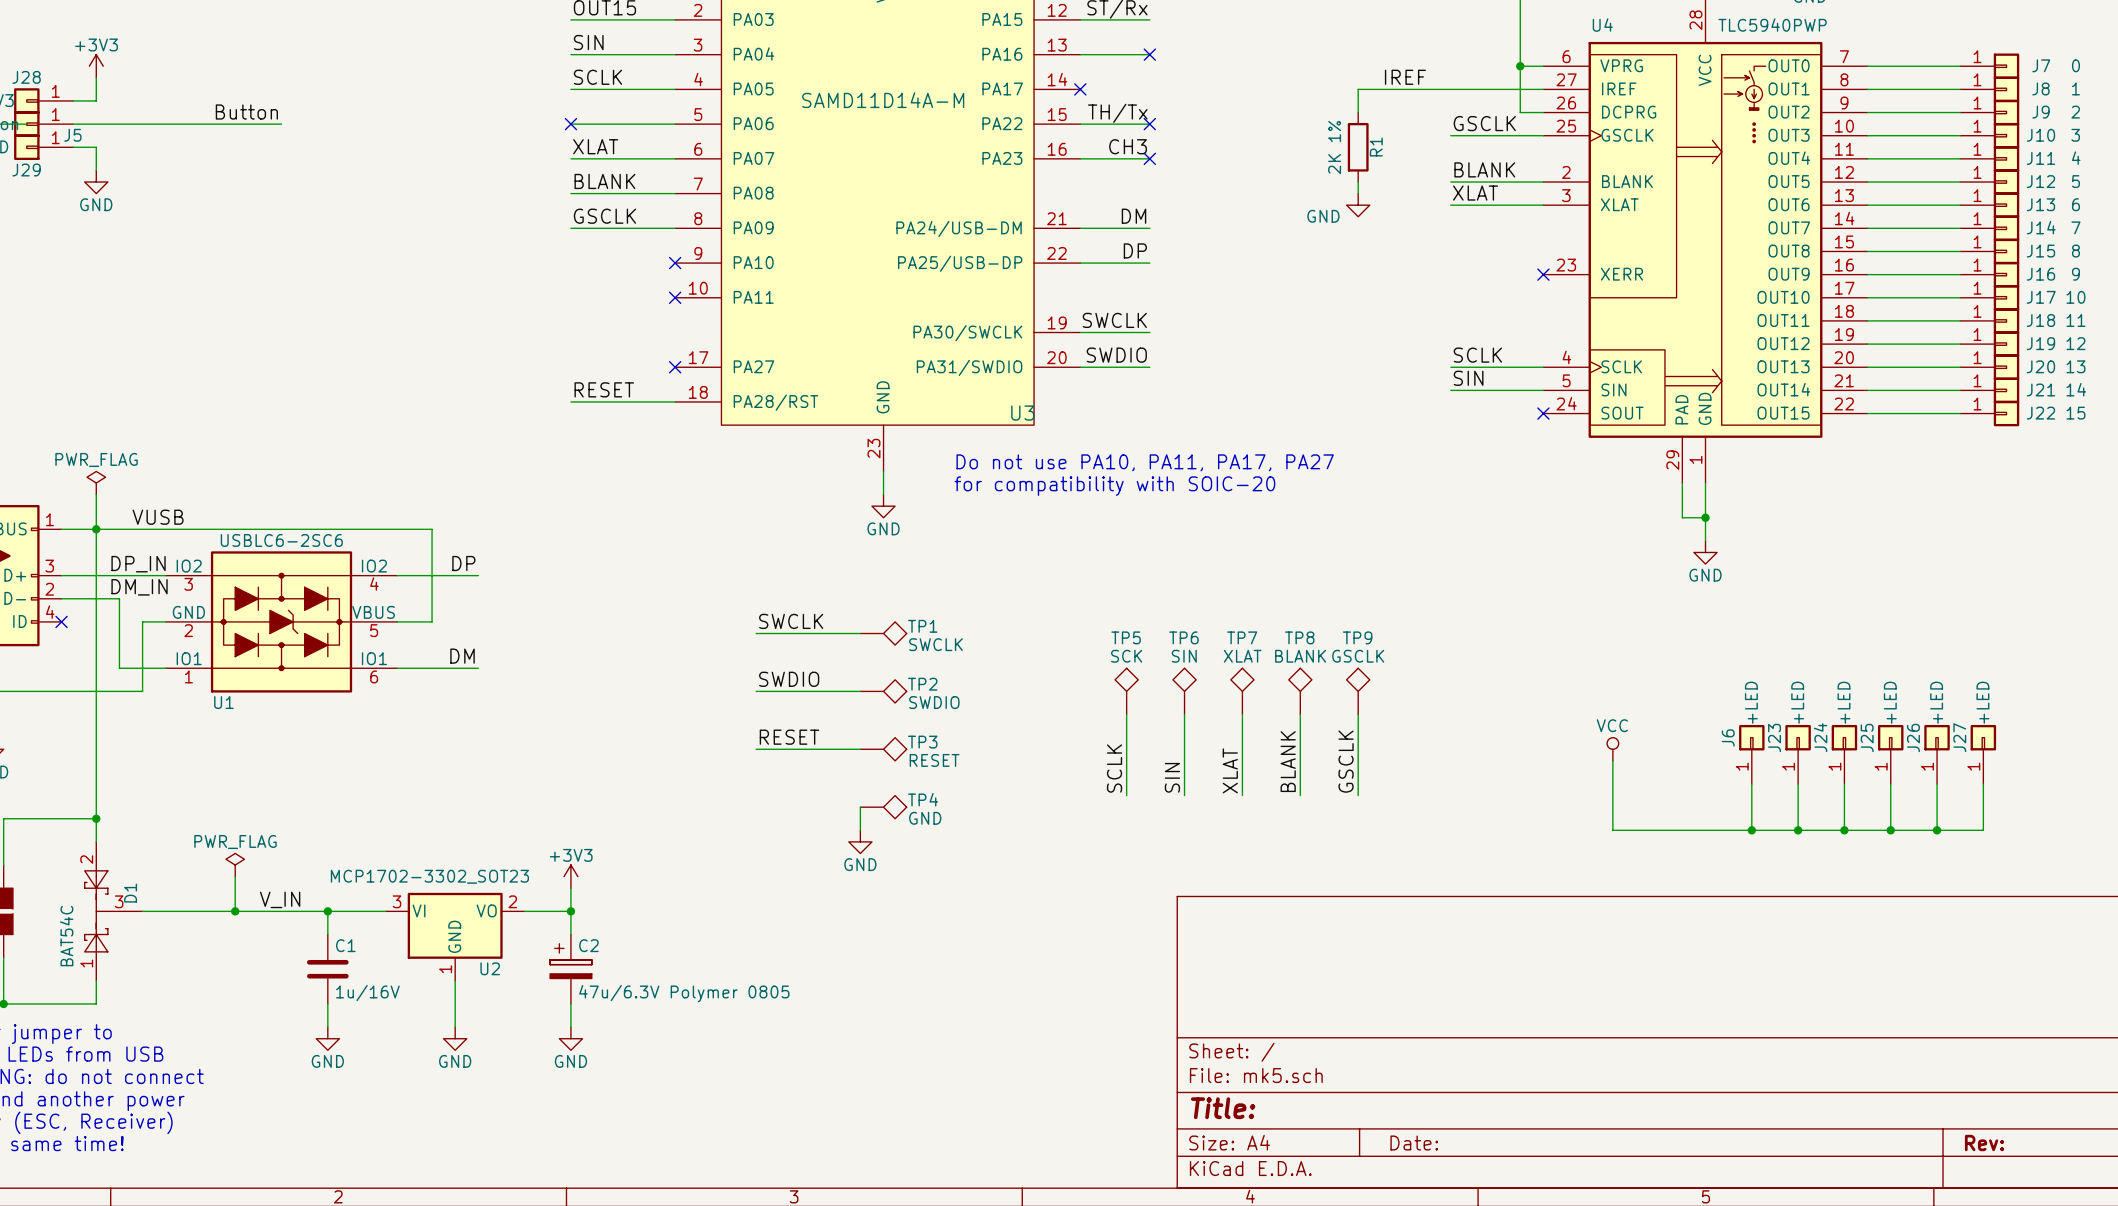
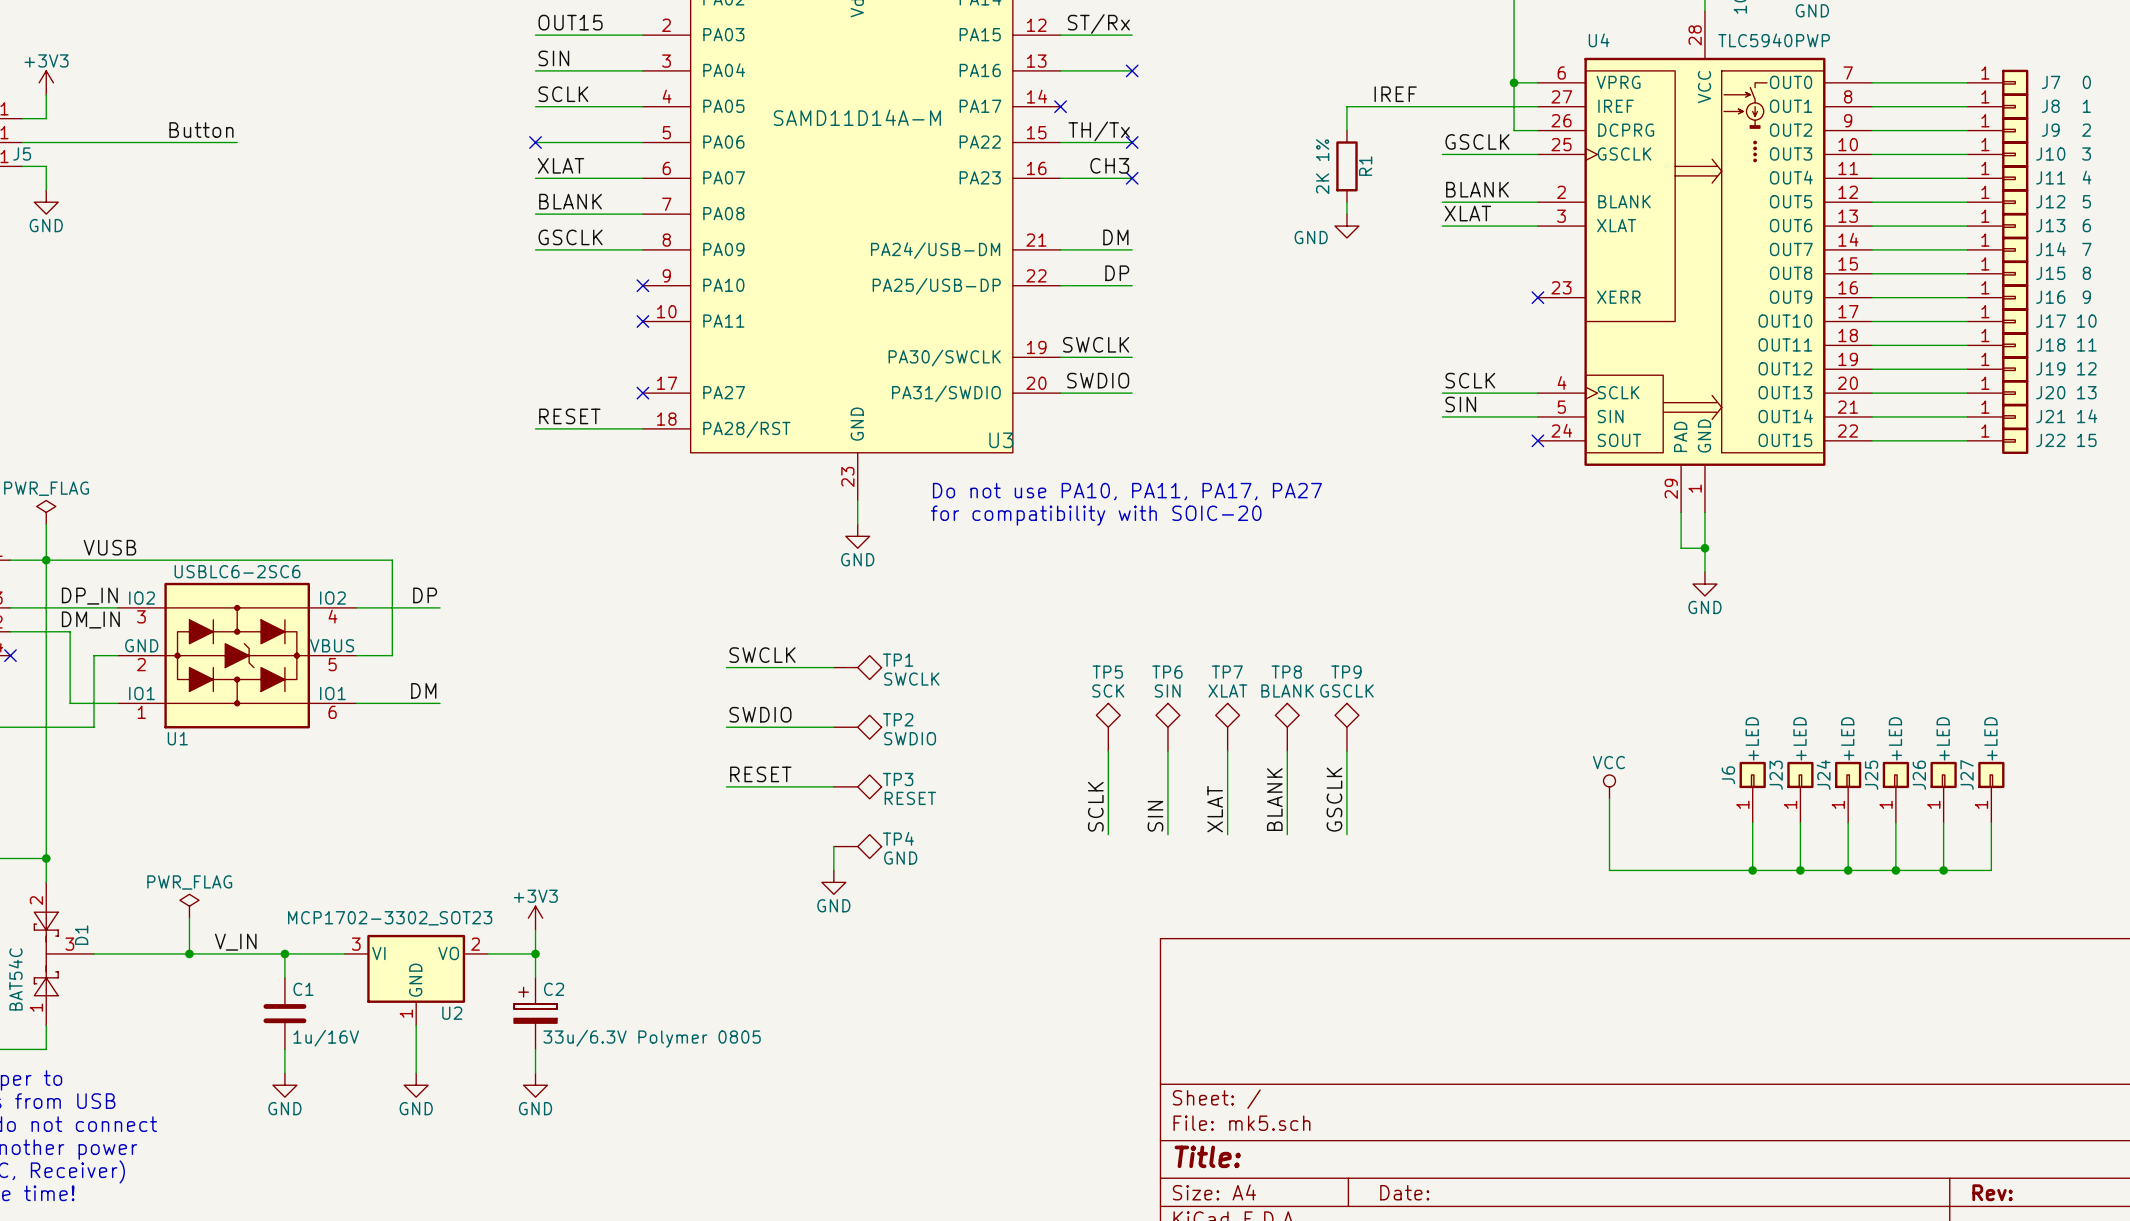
C2 value: 47u/6.3V Polymer 0805 (684, 993) -> 33u/6.3V Polymer 0805 (652, 1038)

